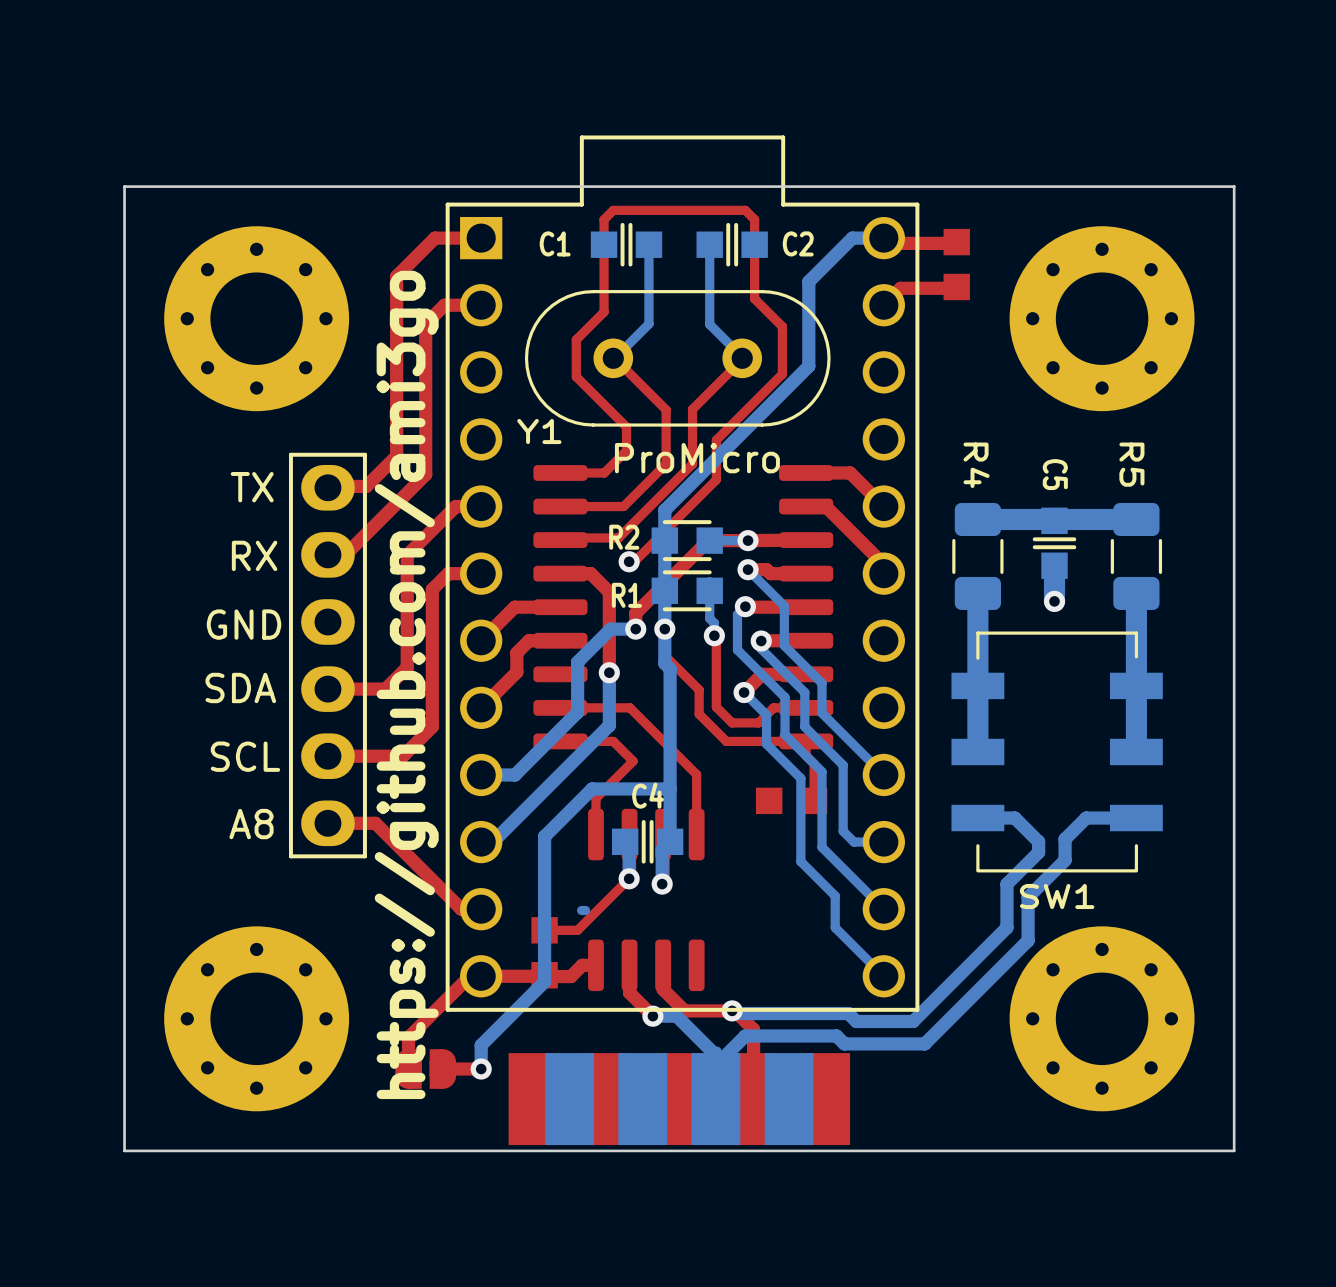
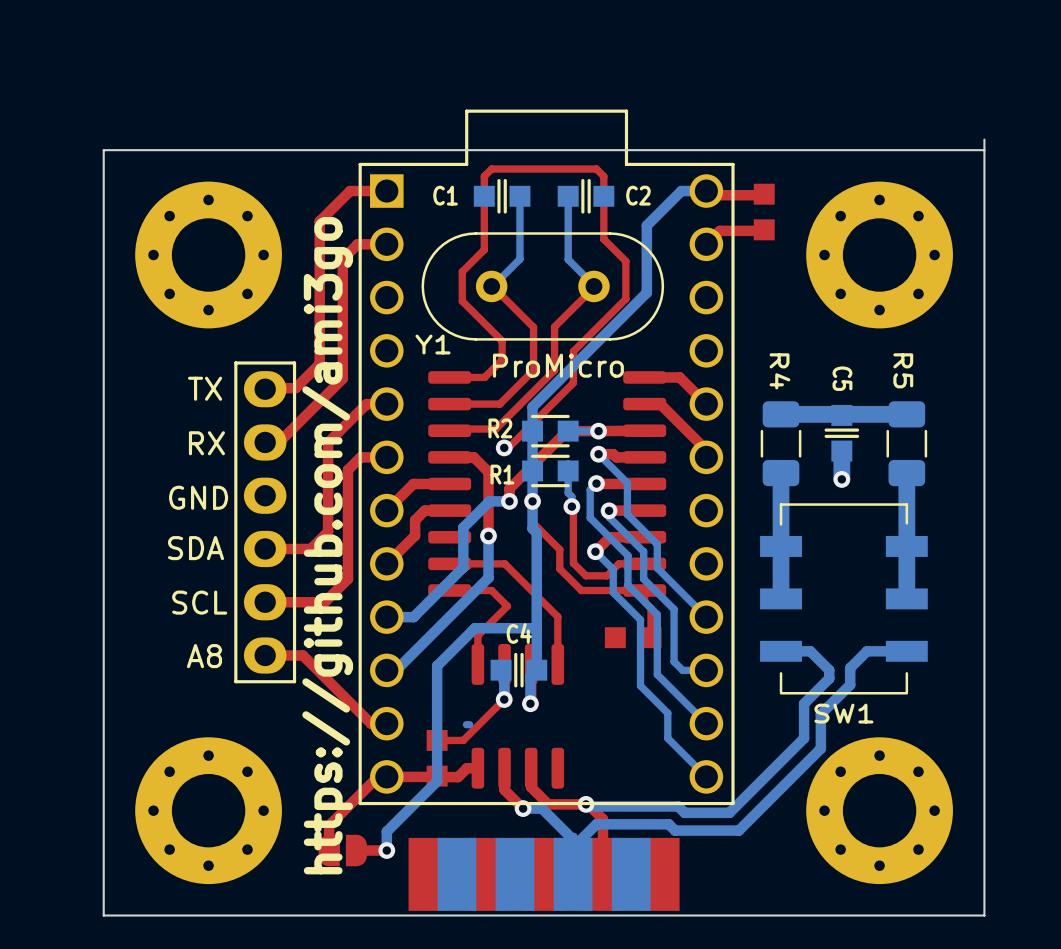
board edge: none -> (984, 139) (984, 150)

